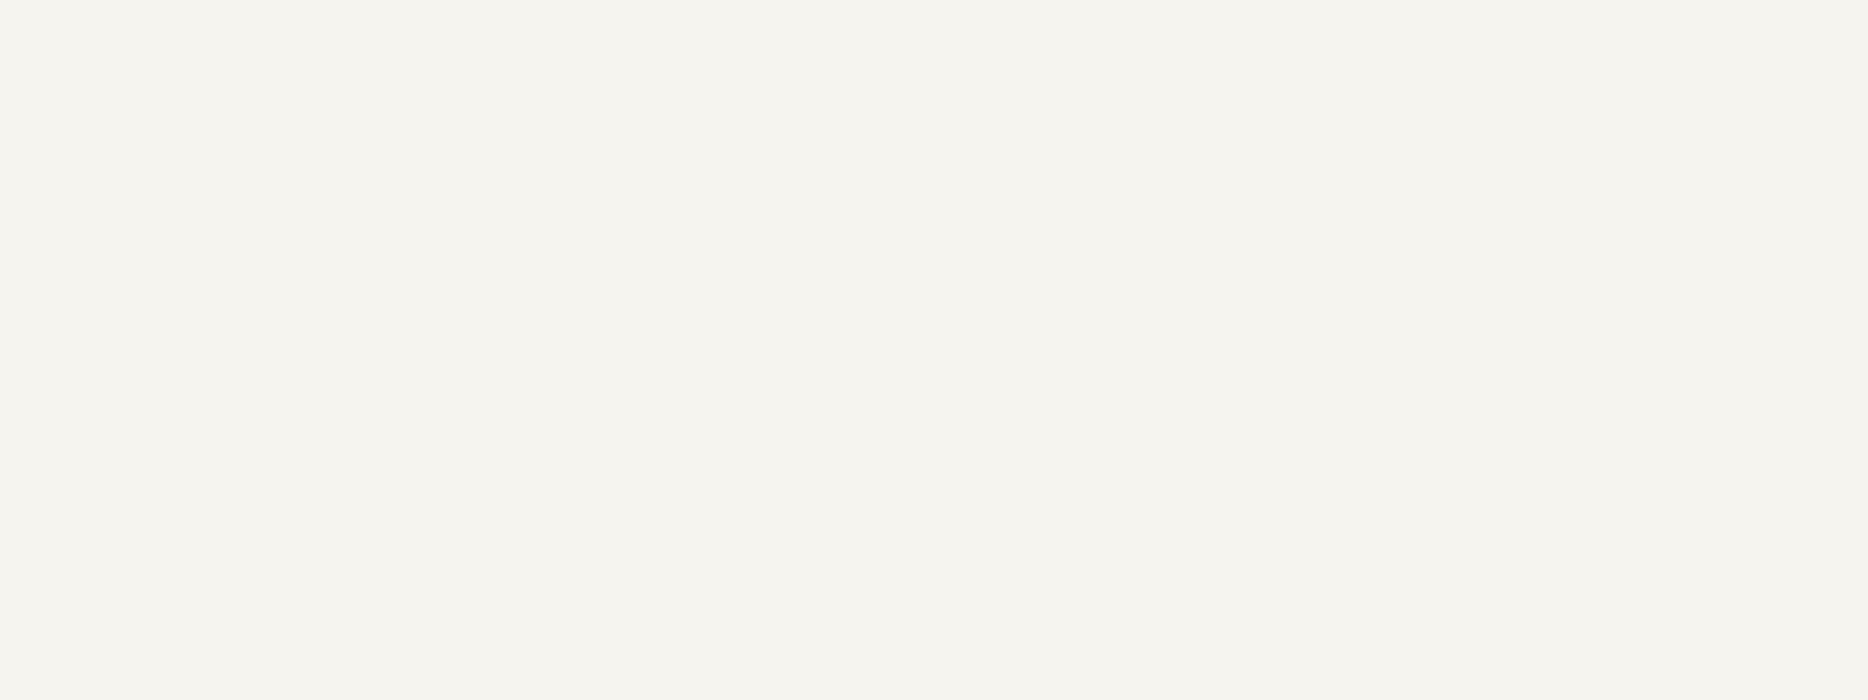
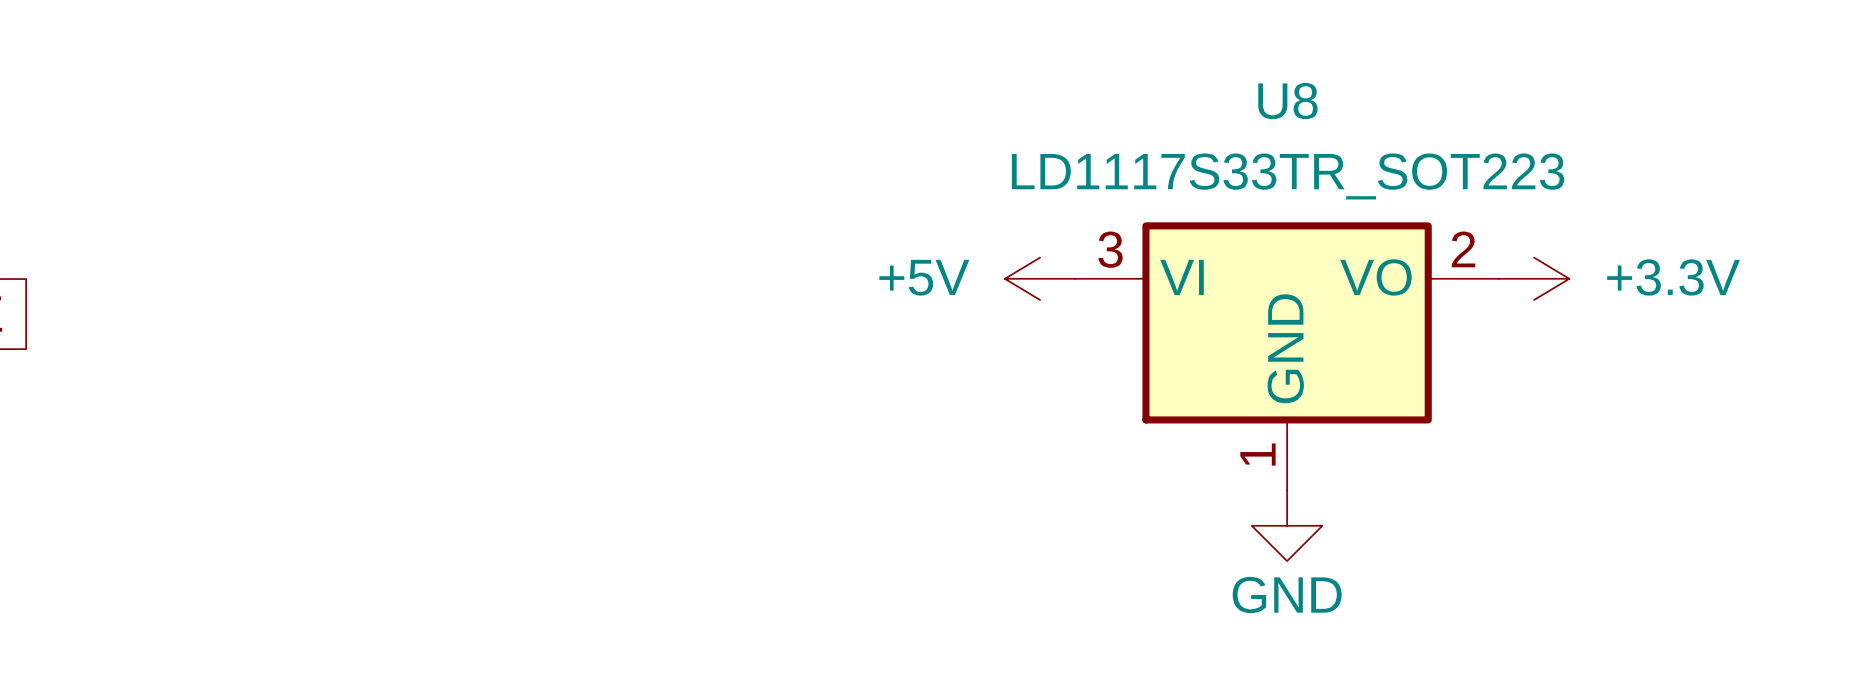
power symbol: none -> +5V (1040, 278)
power symbol: none -> +3.3V (1534, 278)
U8: none -> LD1117S33TR_SOT223 (1287, 356)
power symbol: none -> GND (1287, 525)

